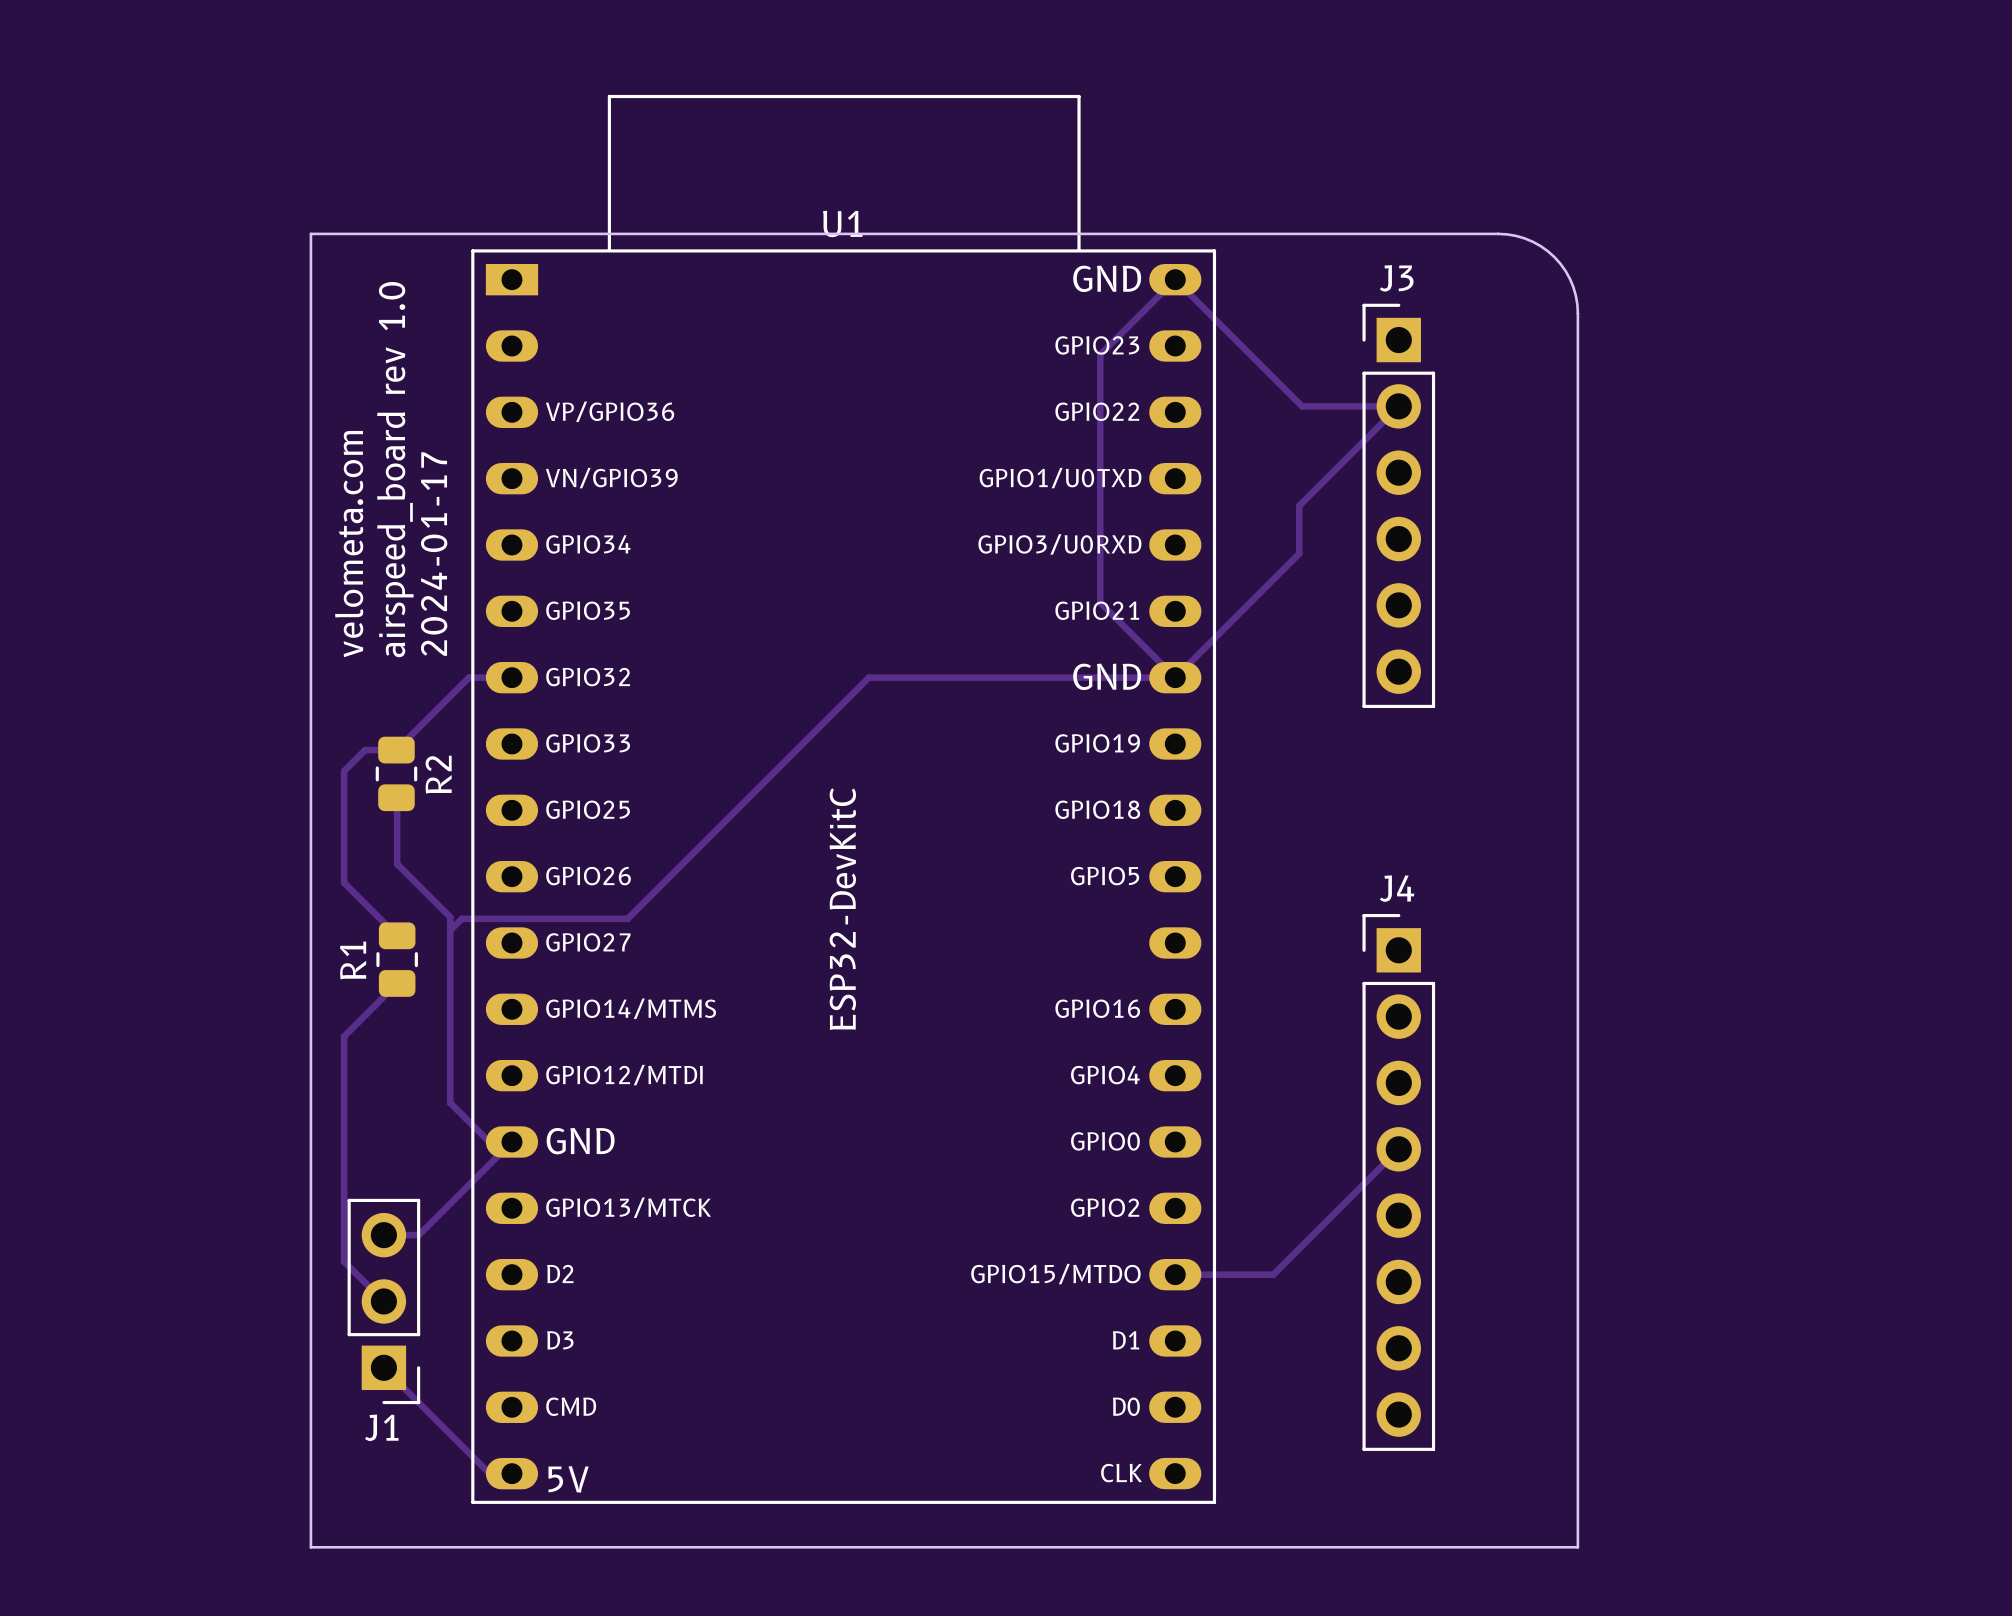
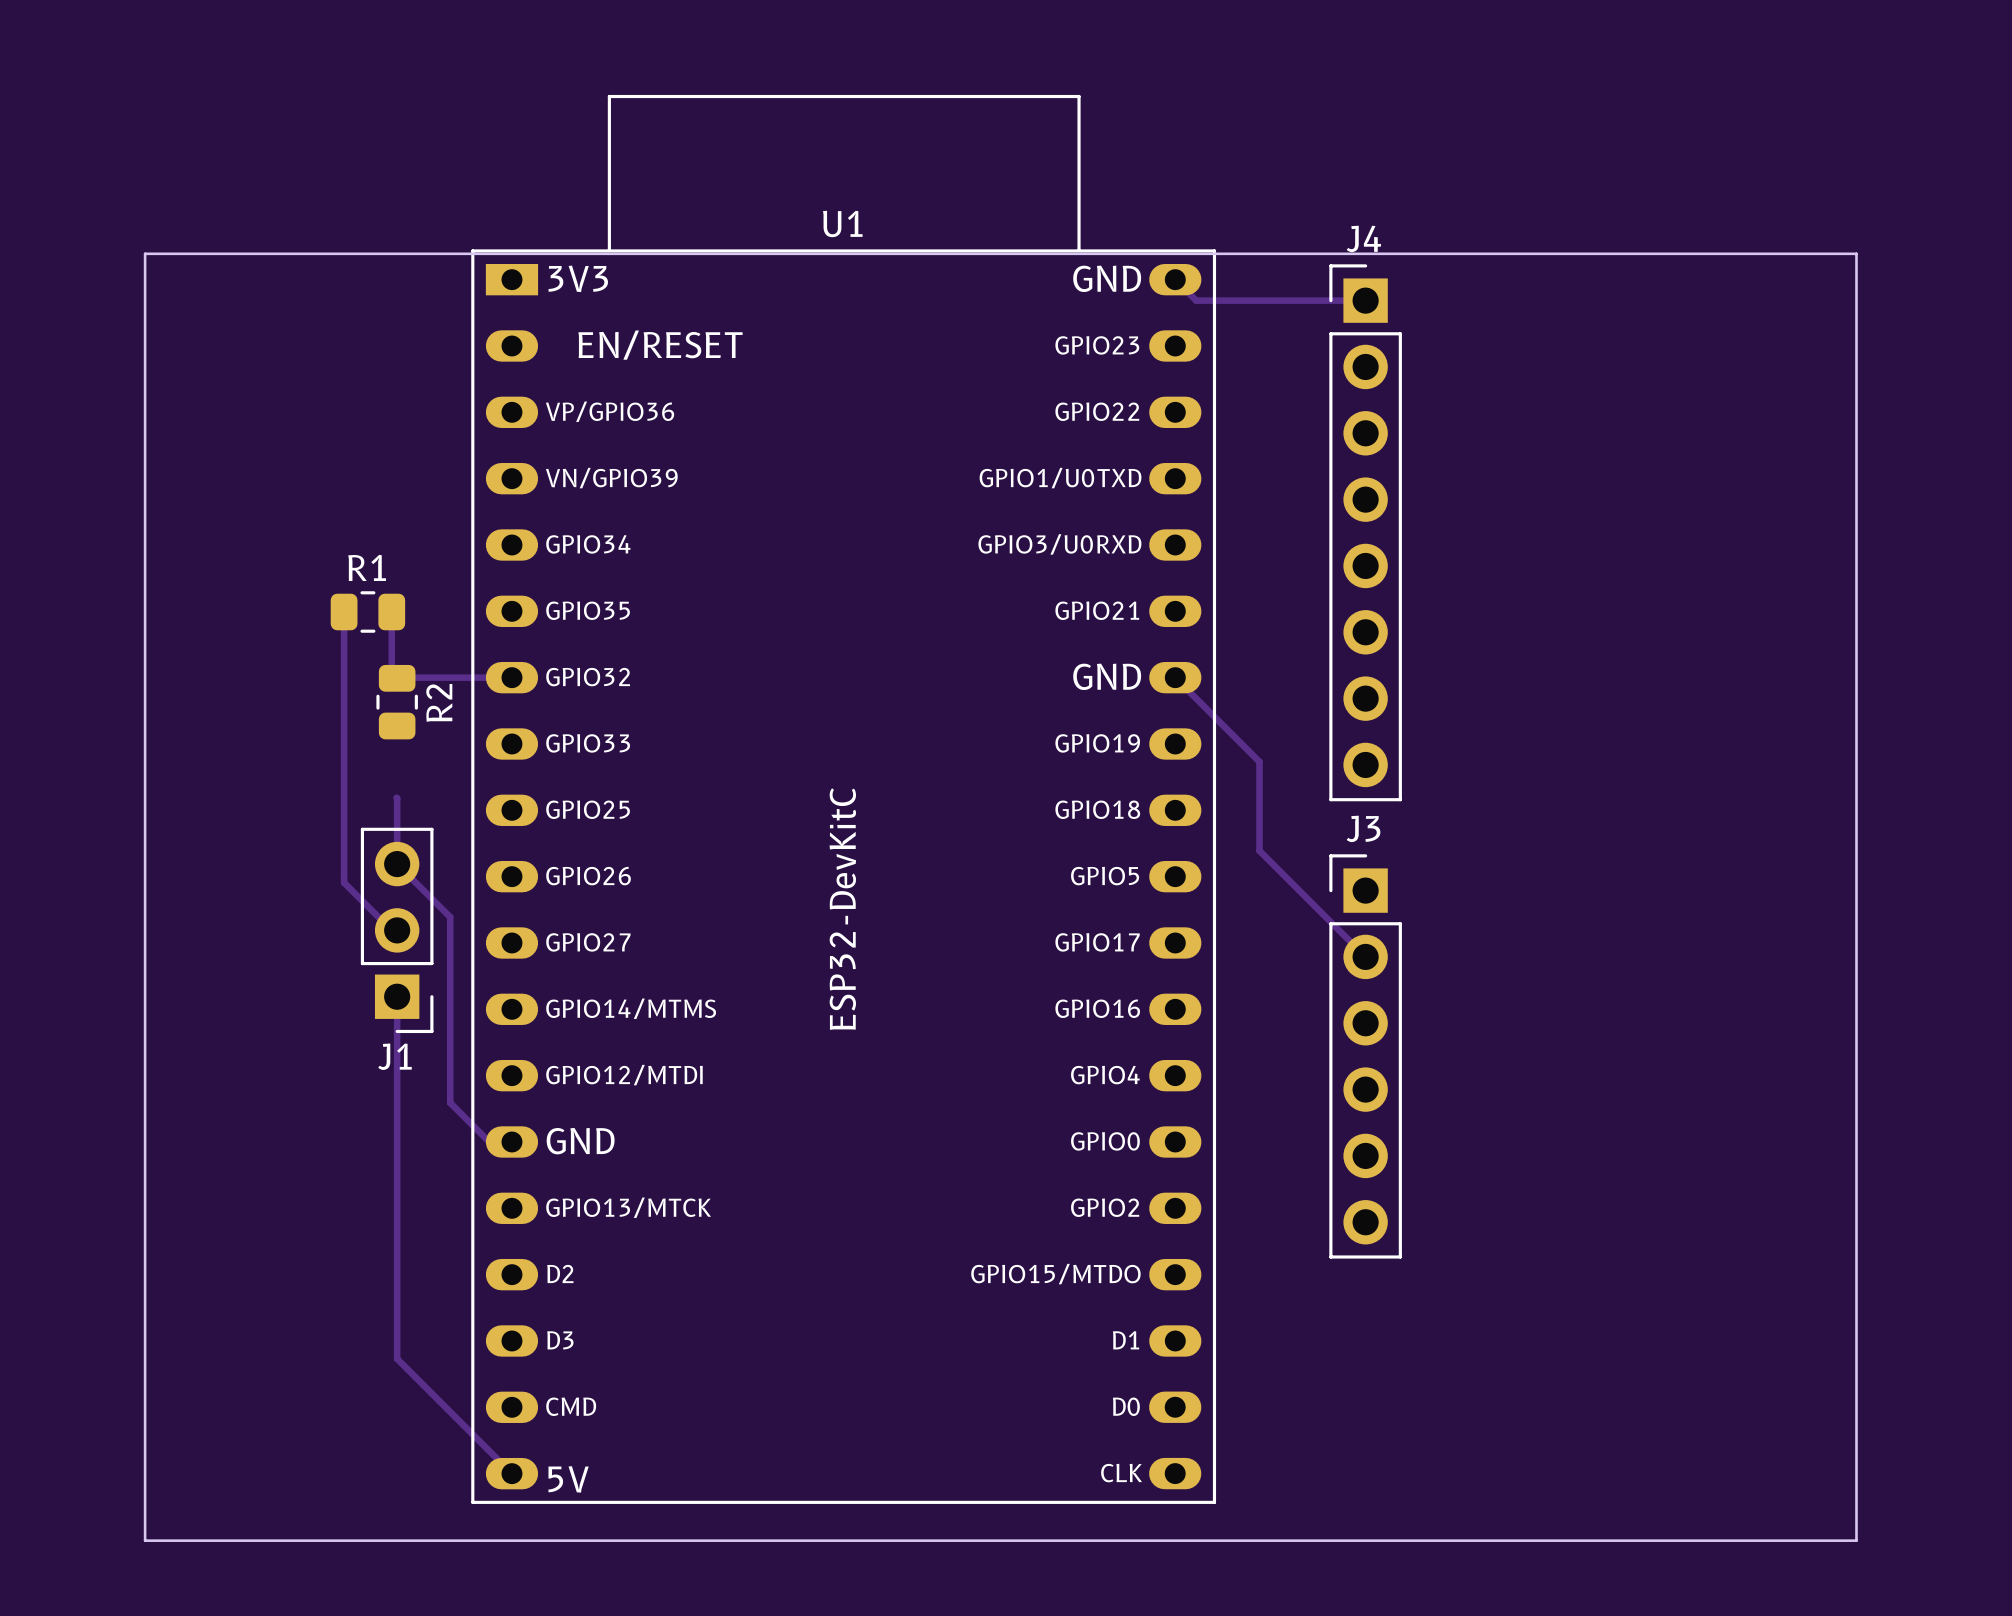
board edge: (310, 233) (310, 1547) (1577, 1547) (1577, 313) (1573, 287) (1565, 271) (1554, 257) (1540, 246) (1524, 238) (1498, 233) (310, 233) -> (145, 253) (145, 1540) (1856, 1540) (1856, 253) (145, 253)
U1 text: none -> 3V3 (578, 278)
track: (1175, 279) (1100, 354) (1100, 602) (1175, 677) -> (1365, 956) (1259, 850) (1259, 761) (1175, 677)
track: (1196, 300) (1302, 406) (1398, 406) (1299, 505) (1299, 553) (1175, 677) -> (1196, 300) (1365, 300)
U1 text: none -> EN/RESET (660, 345)
text: airspeed_board rev 1.0 (395, 469) -> none
J3 position: (1398, 505) -> (1365, 1056)
text: velometa.com (349, 544) -> none
text: 2024-01-17 (434, 554) -> none
track: none -> (391, 612) (391, 672) (397, 678) (468, 677)
track: (468, 677) (396, 750) (365, 750) (344, 771) -> (344, 612) (344, 771)
track: (1175, 677) (868, 677) (627, 918) (461, 918) (450, 930) -> none
R2 position: (396, 773) -> (397, 702)
U1 text: none -> GPIO17 (1097, 942)
R1 rotation: 0° (397, 959) -> 90° clockwise (367, 612)
R1 position: (397, 959) -> (367, 612)
track: (397, 983) (344, 1036) (344, 1261) (383, 1301) -> none
track: (511, 1141) (418, 1235) (383, 1235) -> none
track: (1398, 1149) (1273, 1274) (1175, 1274) -> none
J4 position: (1398, 1182) -> (1365, 532)
J1 position: (383, 1301) -> (397, 930)
track: (383, 1367) (489, 1473) (511, 1473) -> (397, 996) (397, 1358) (511, 1473)

